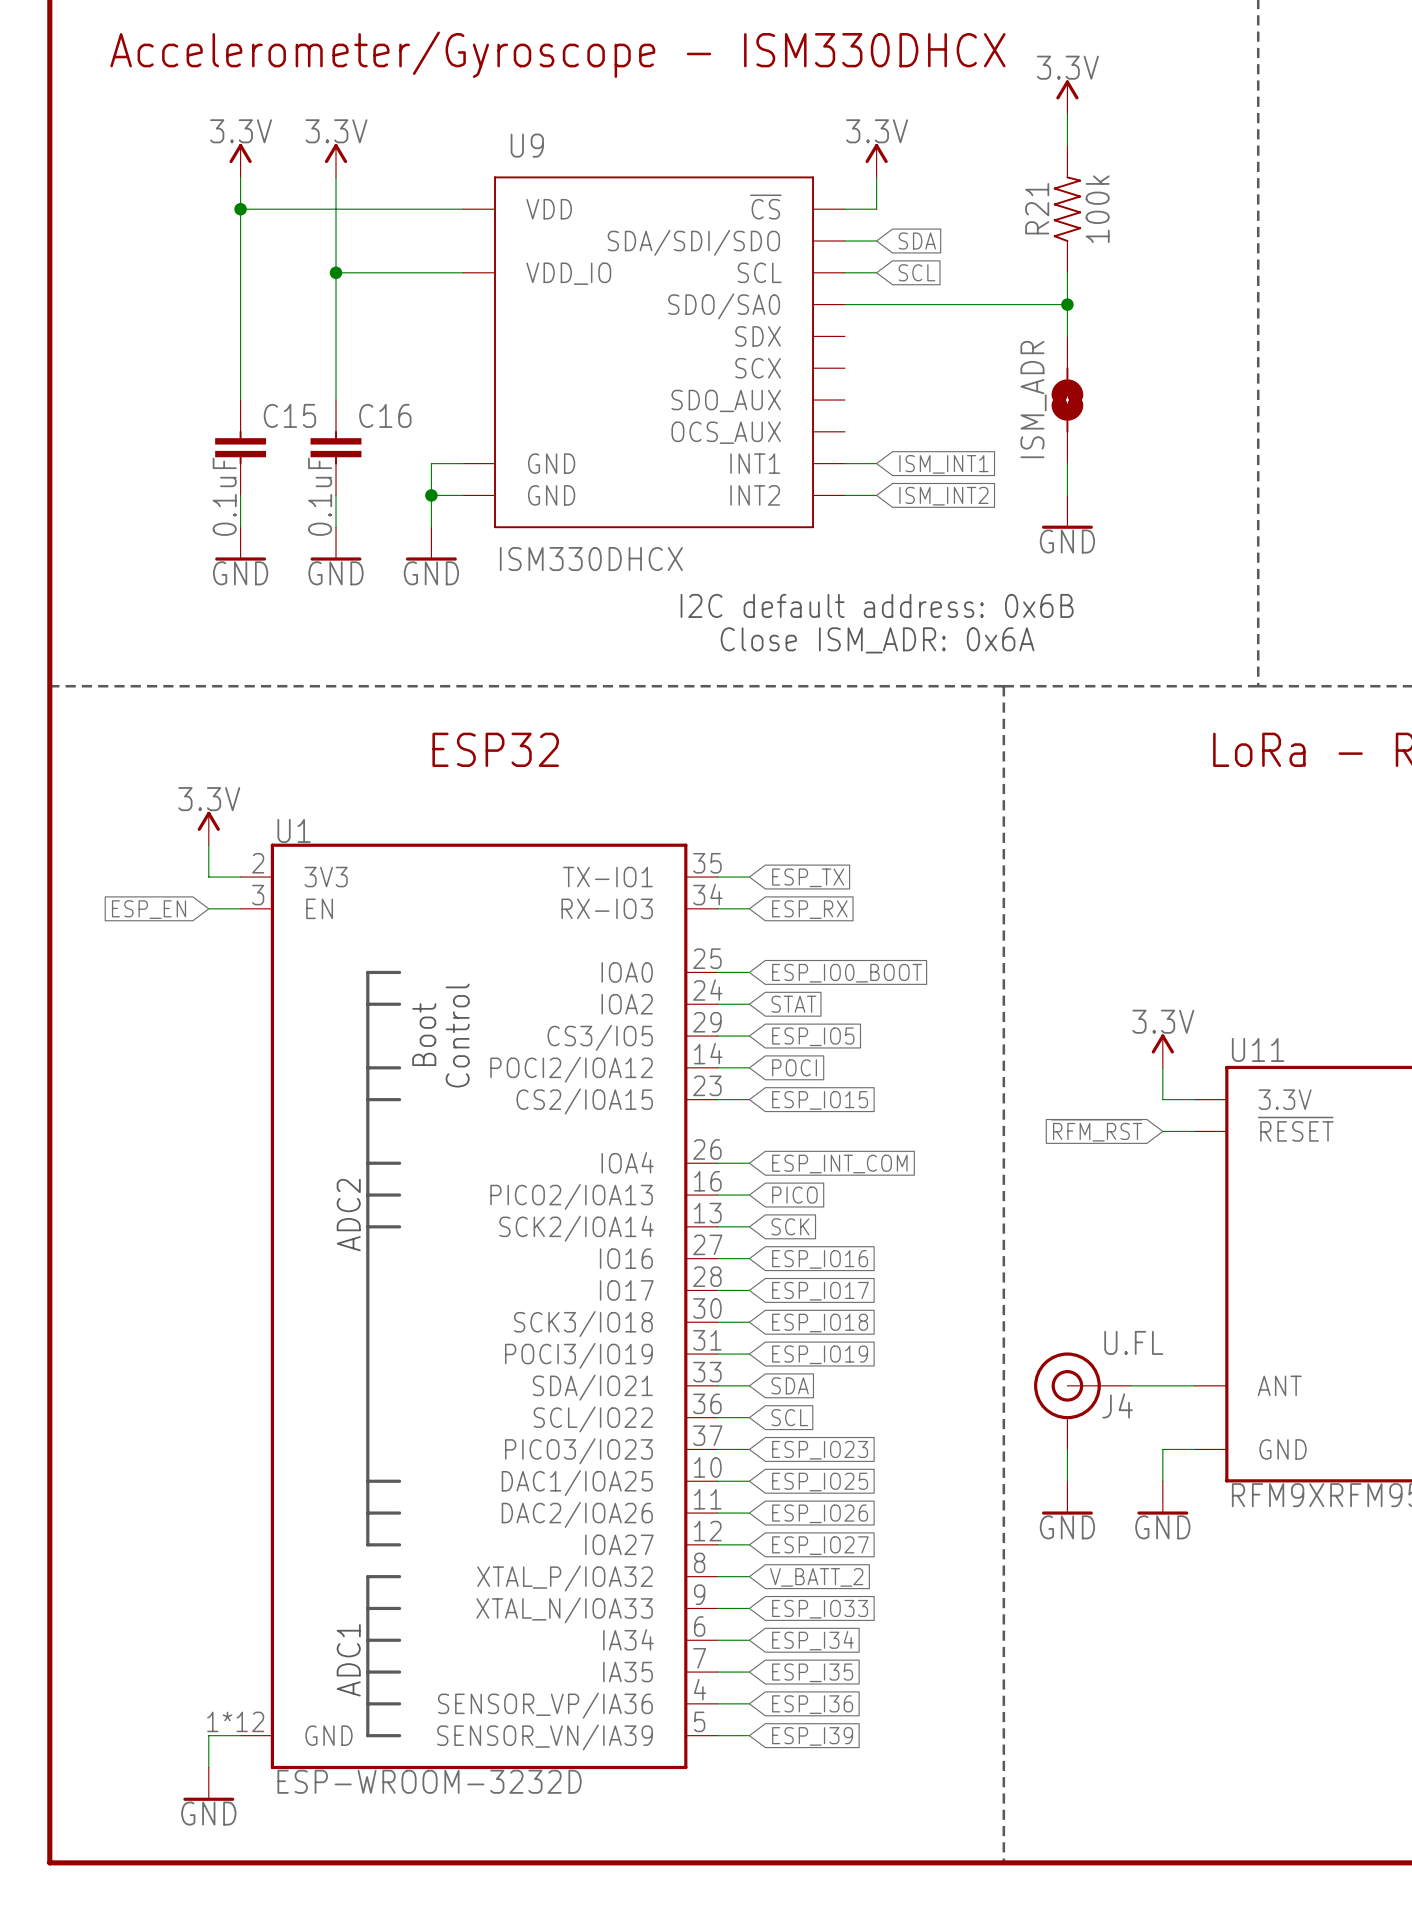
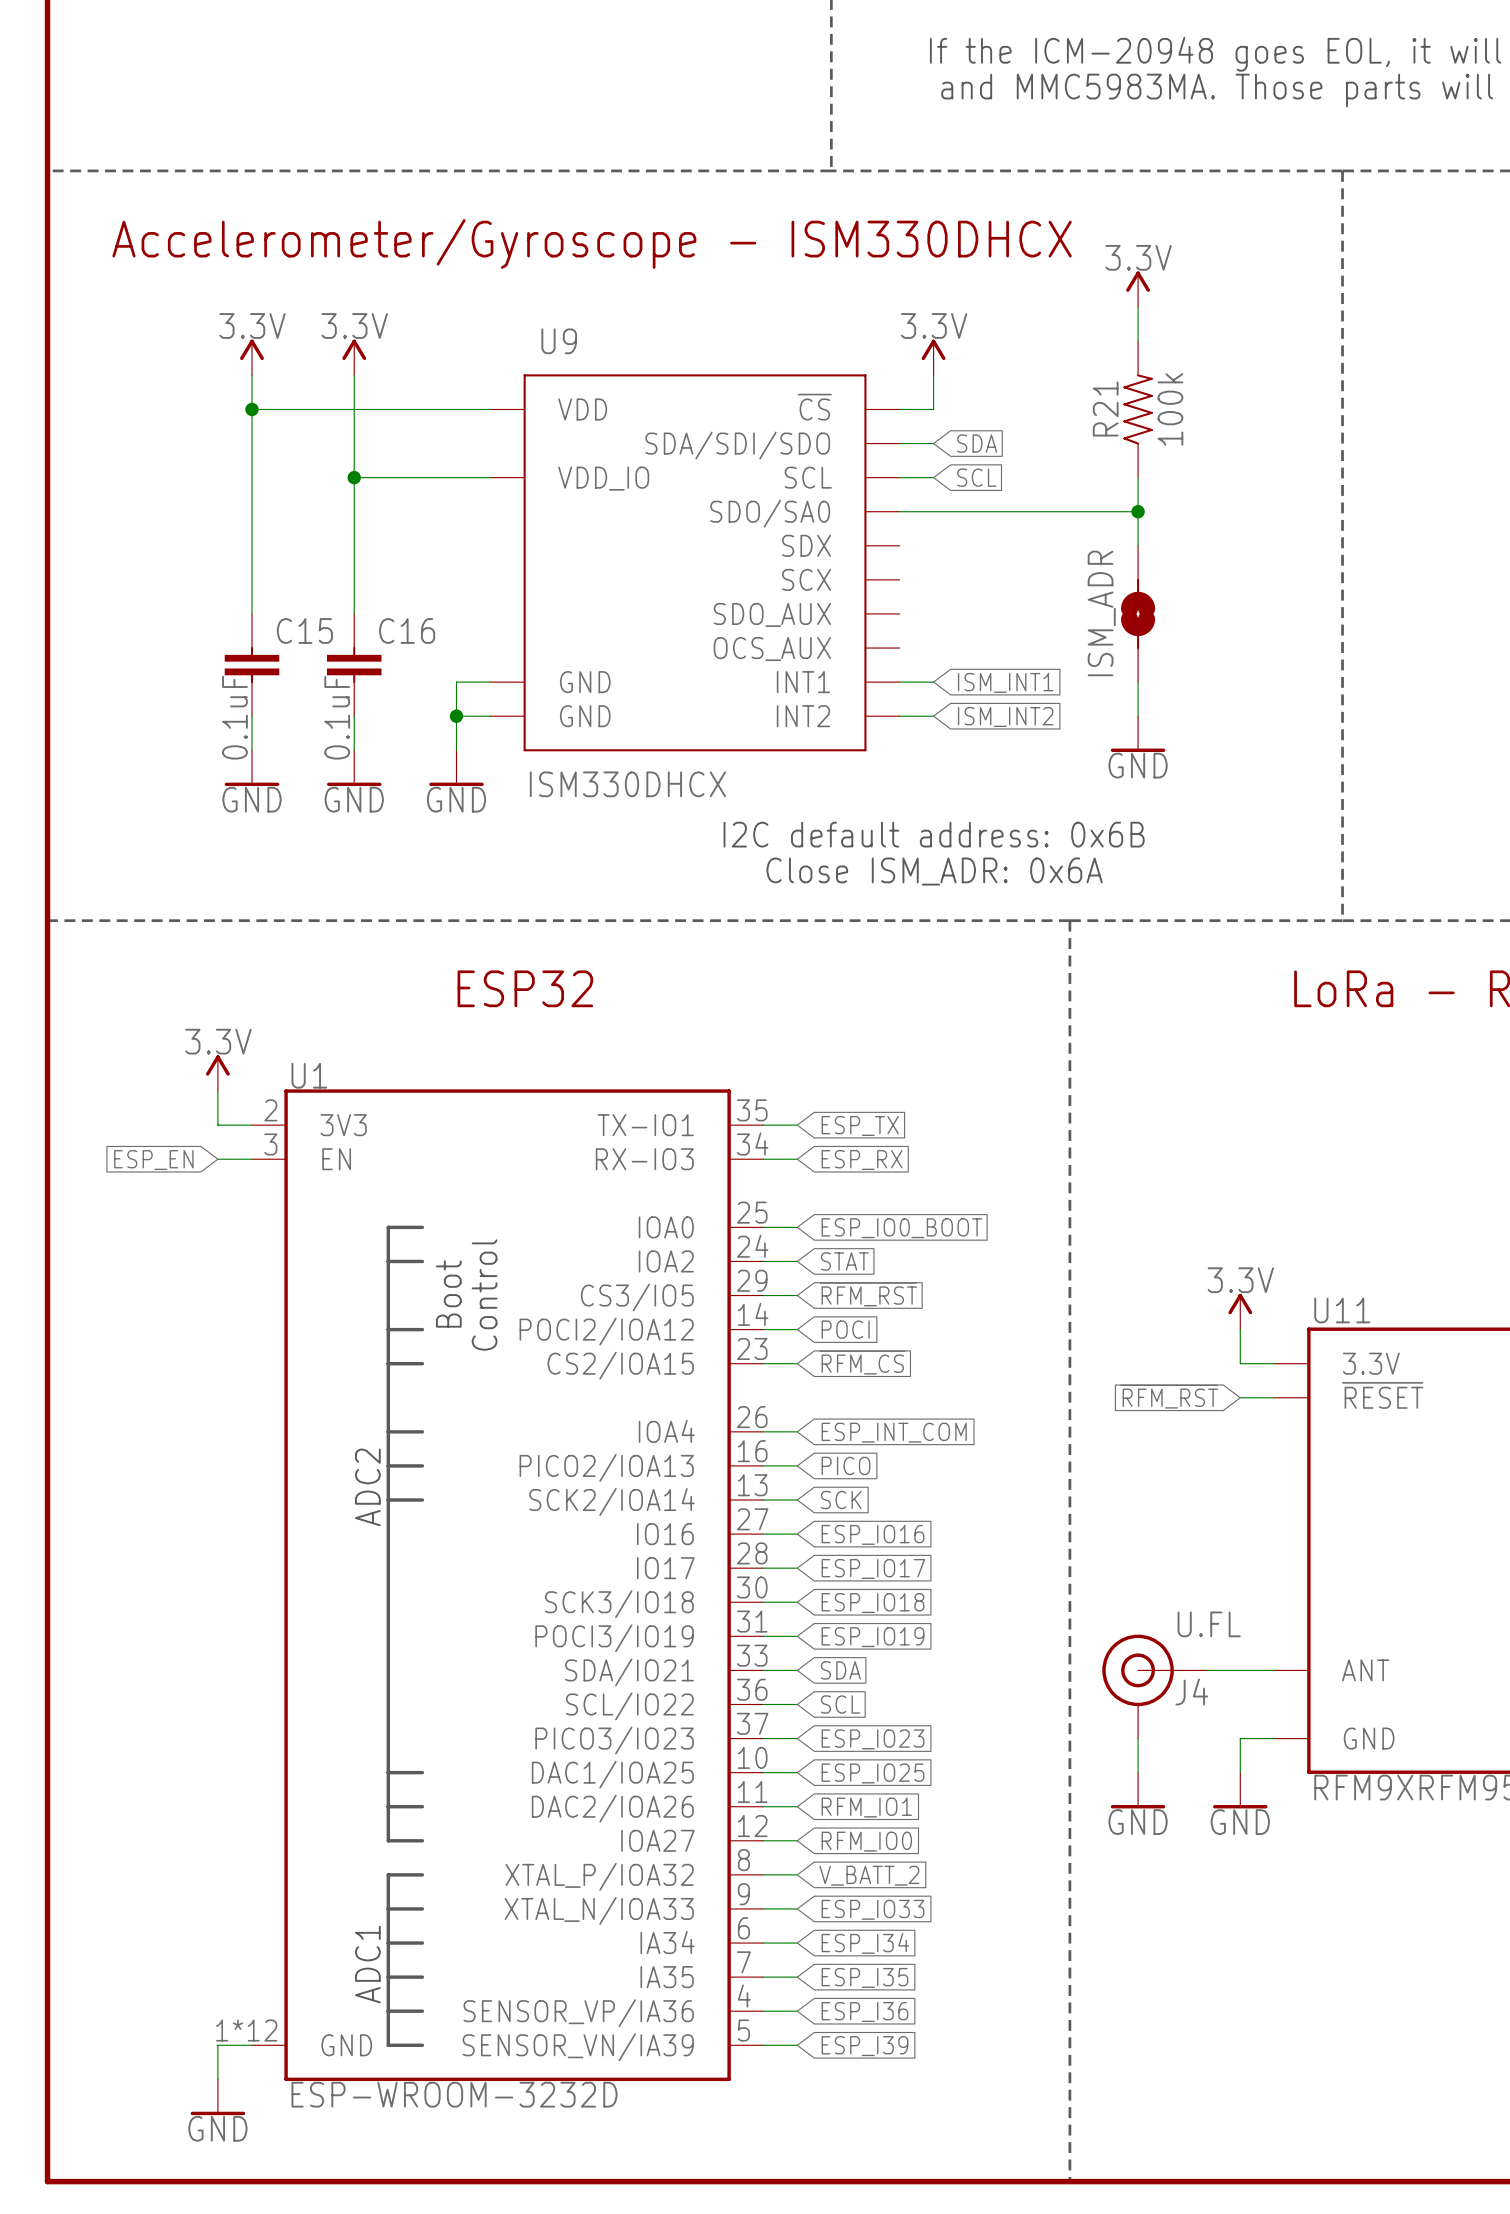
global label: ESP_IO5 (813, 1036) -> ~{RFM_RST} (868, 1294)
global label: ESP_IO15 (820, 1100) -> ~{RFM_CS} (862, 1362)
global label: ESP_IO26 (820, 1513) -> RFM_IO1 (866, 1807)
global label: ESP_IO27 (820, 1545) -> RFM_IO0 (866, 1841)

